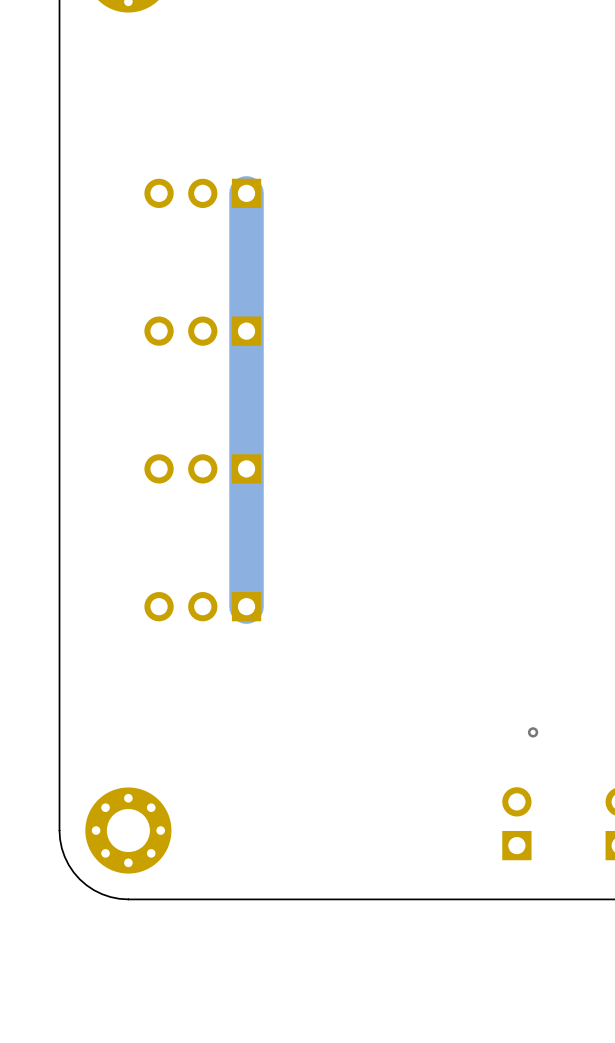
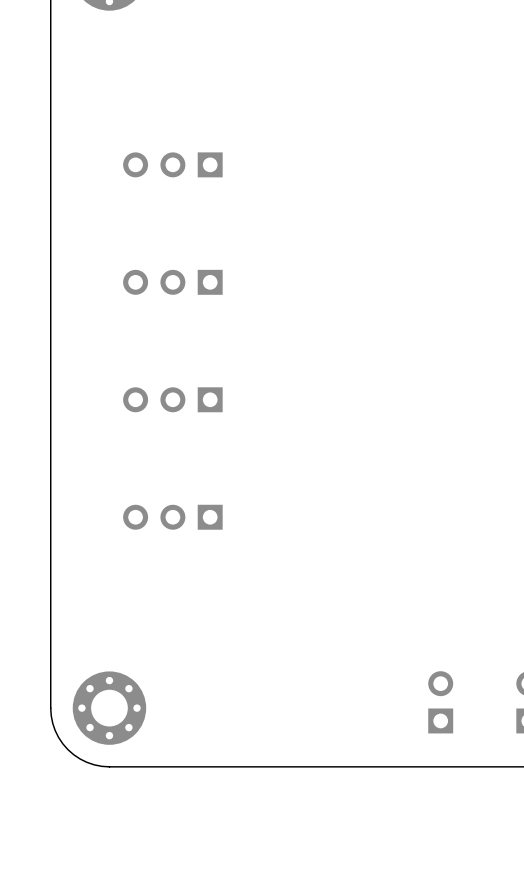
track: (246, 193) (246, 606) -> none
via: (533, 732) -> none

